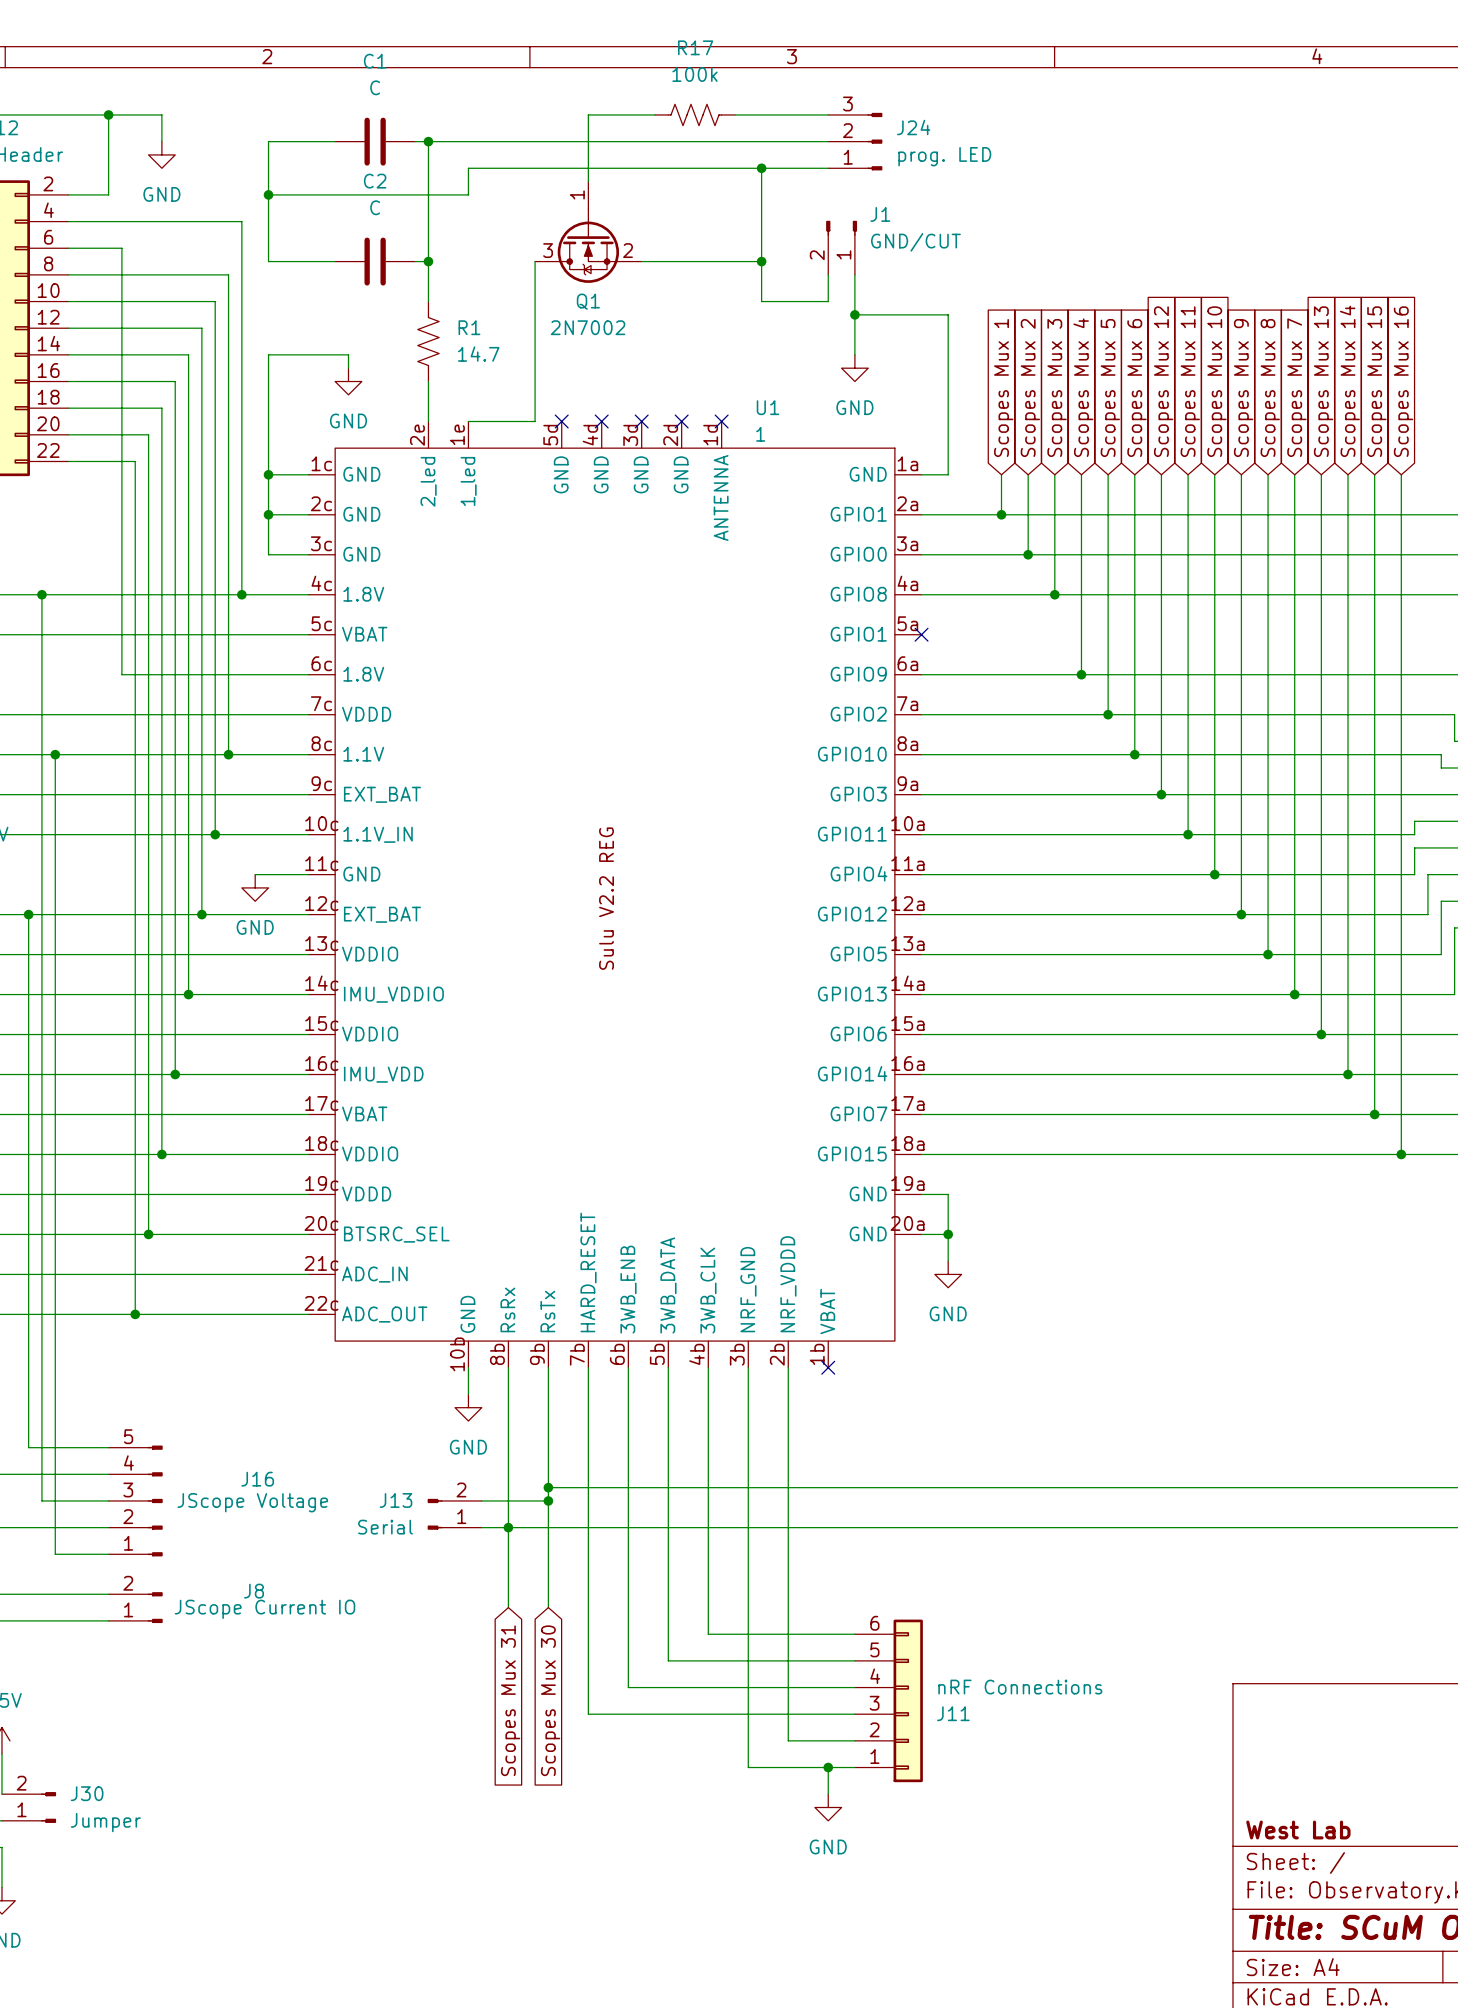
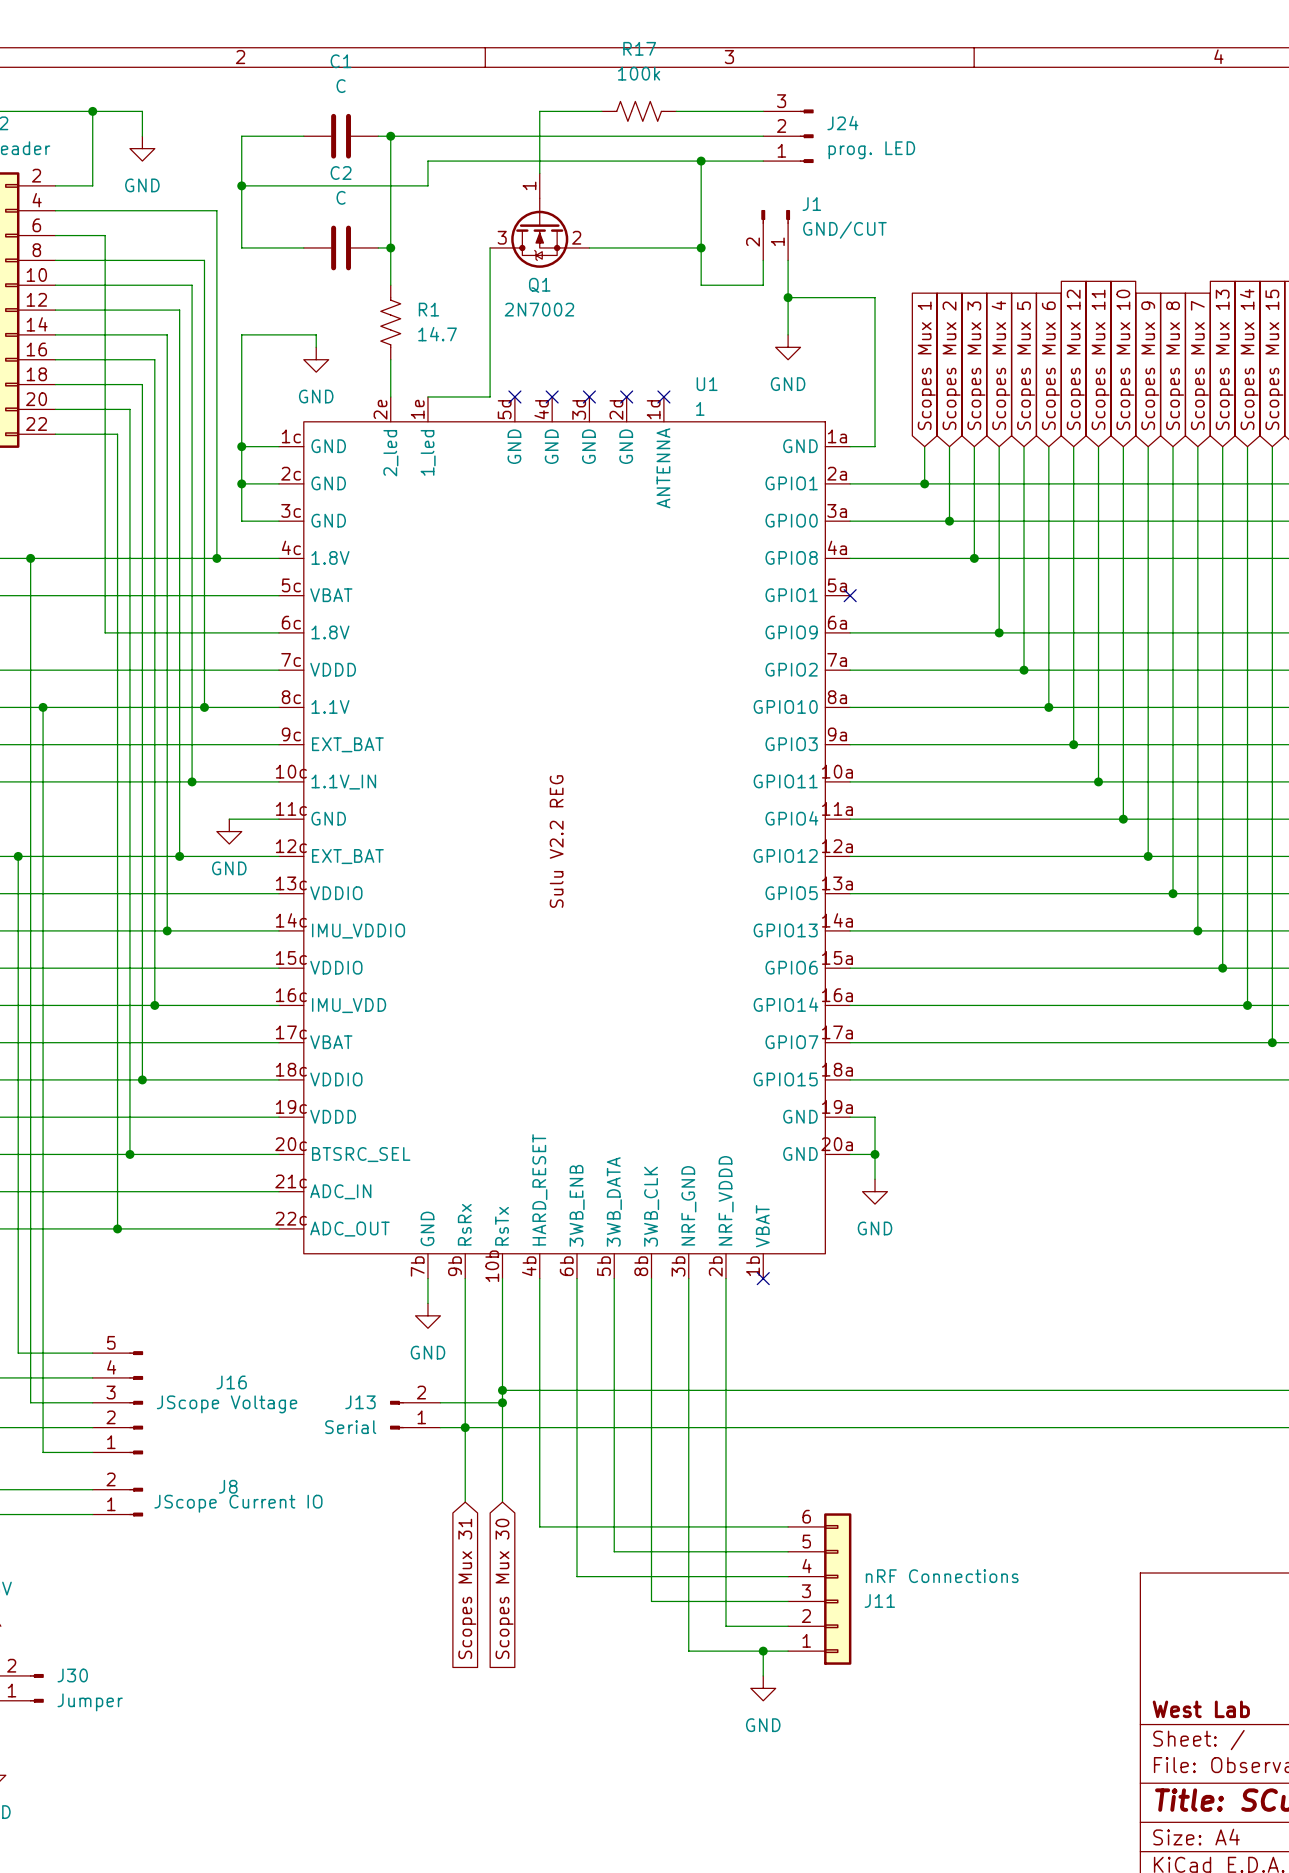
U1 pin number: 10b (457, 1354) -> 7b (417, 1266)
U1 pin number: 8b (497, 1354) -> 9b (454, 1266)
U1 pin number: 9b (537, 1354) -> 10b (492, 1266)
U1 pin number: 7b (577, 1354) -> 4b (529, 1266)
U1 pin number: 4b (697, 1354) -> 8b (641, 1266)
wire: (588, 1634) (588, 1714) (708, 1714) -> (539, 1526) (651, 1526) (651, 1601)

